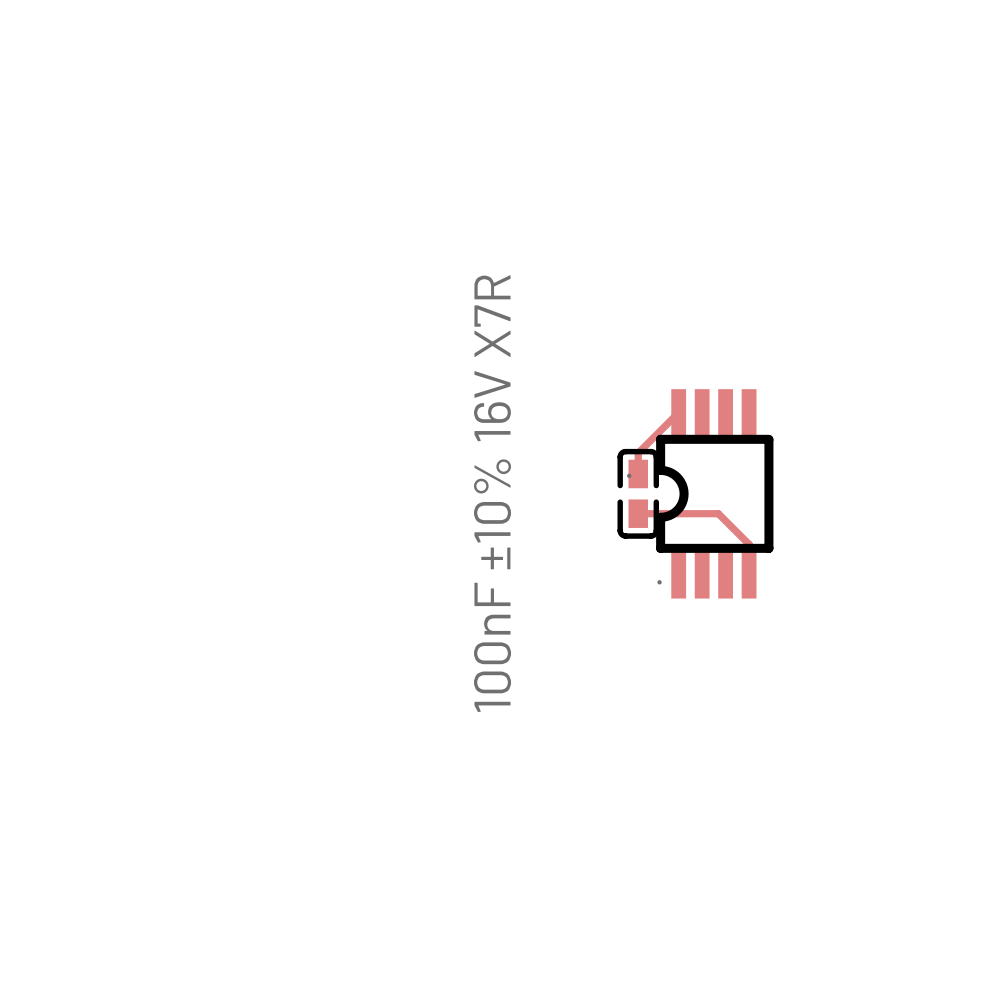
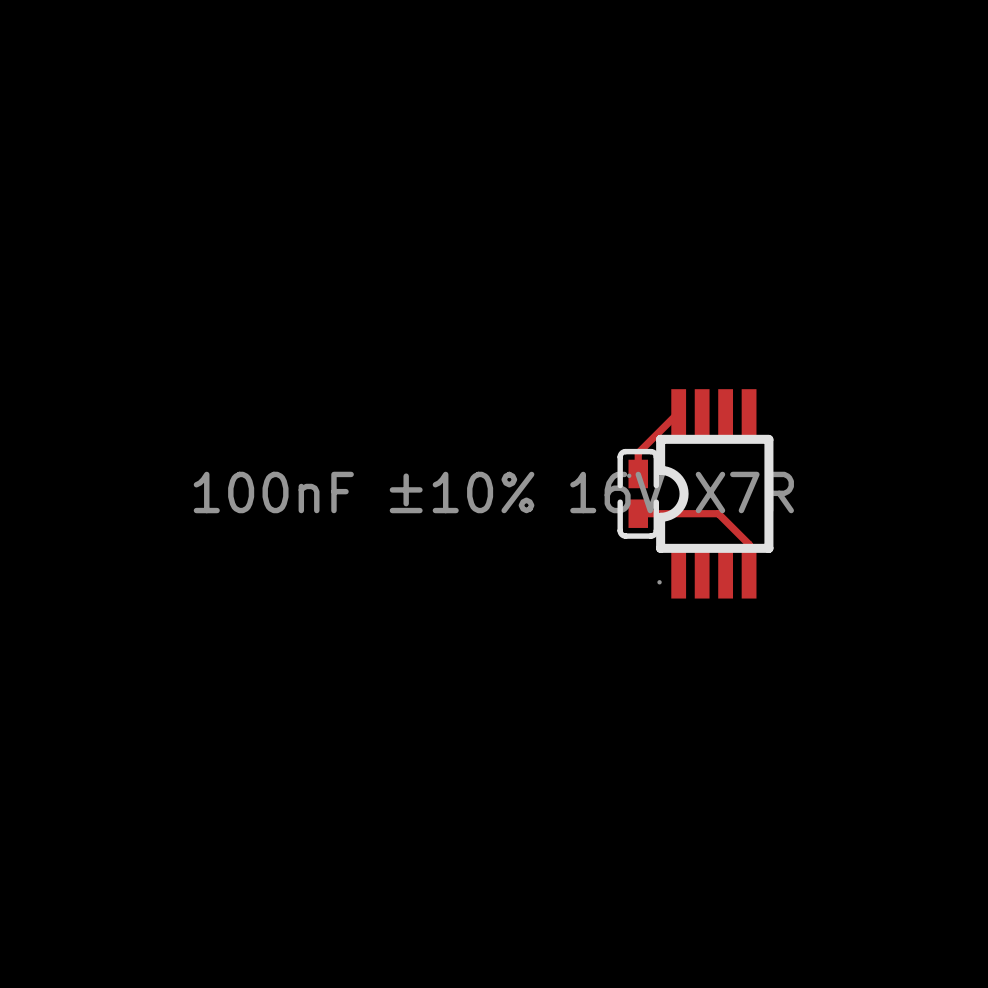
part value rotation: 0° (492, 493) -> 90° clockwise (493, 492)

